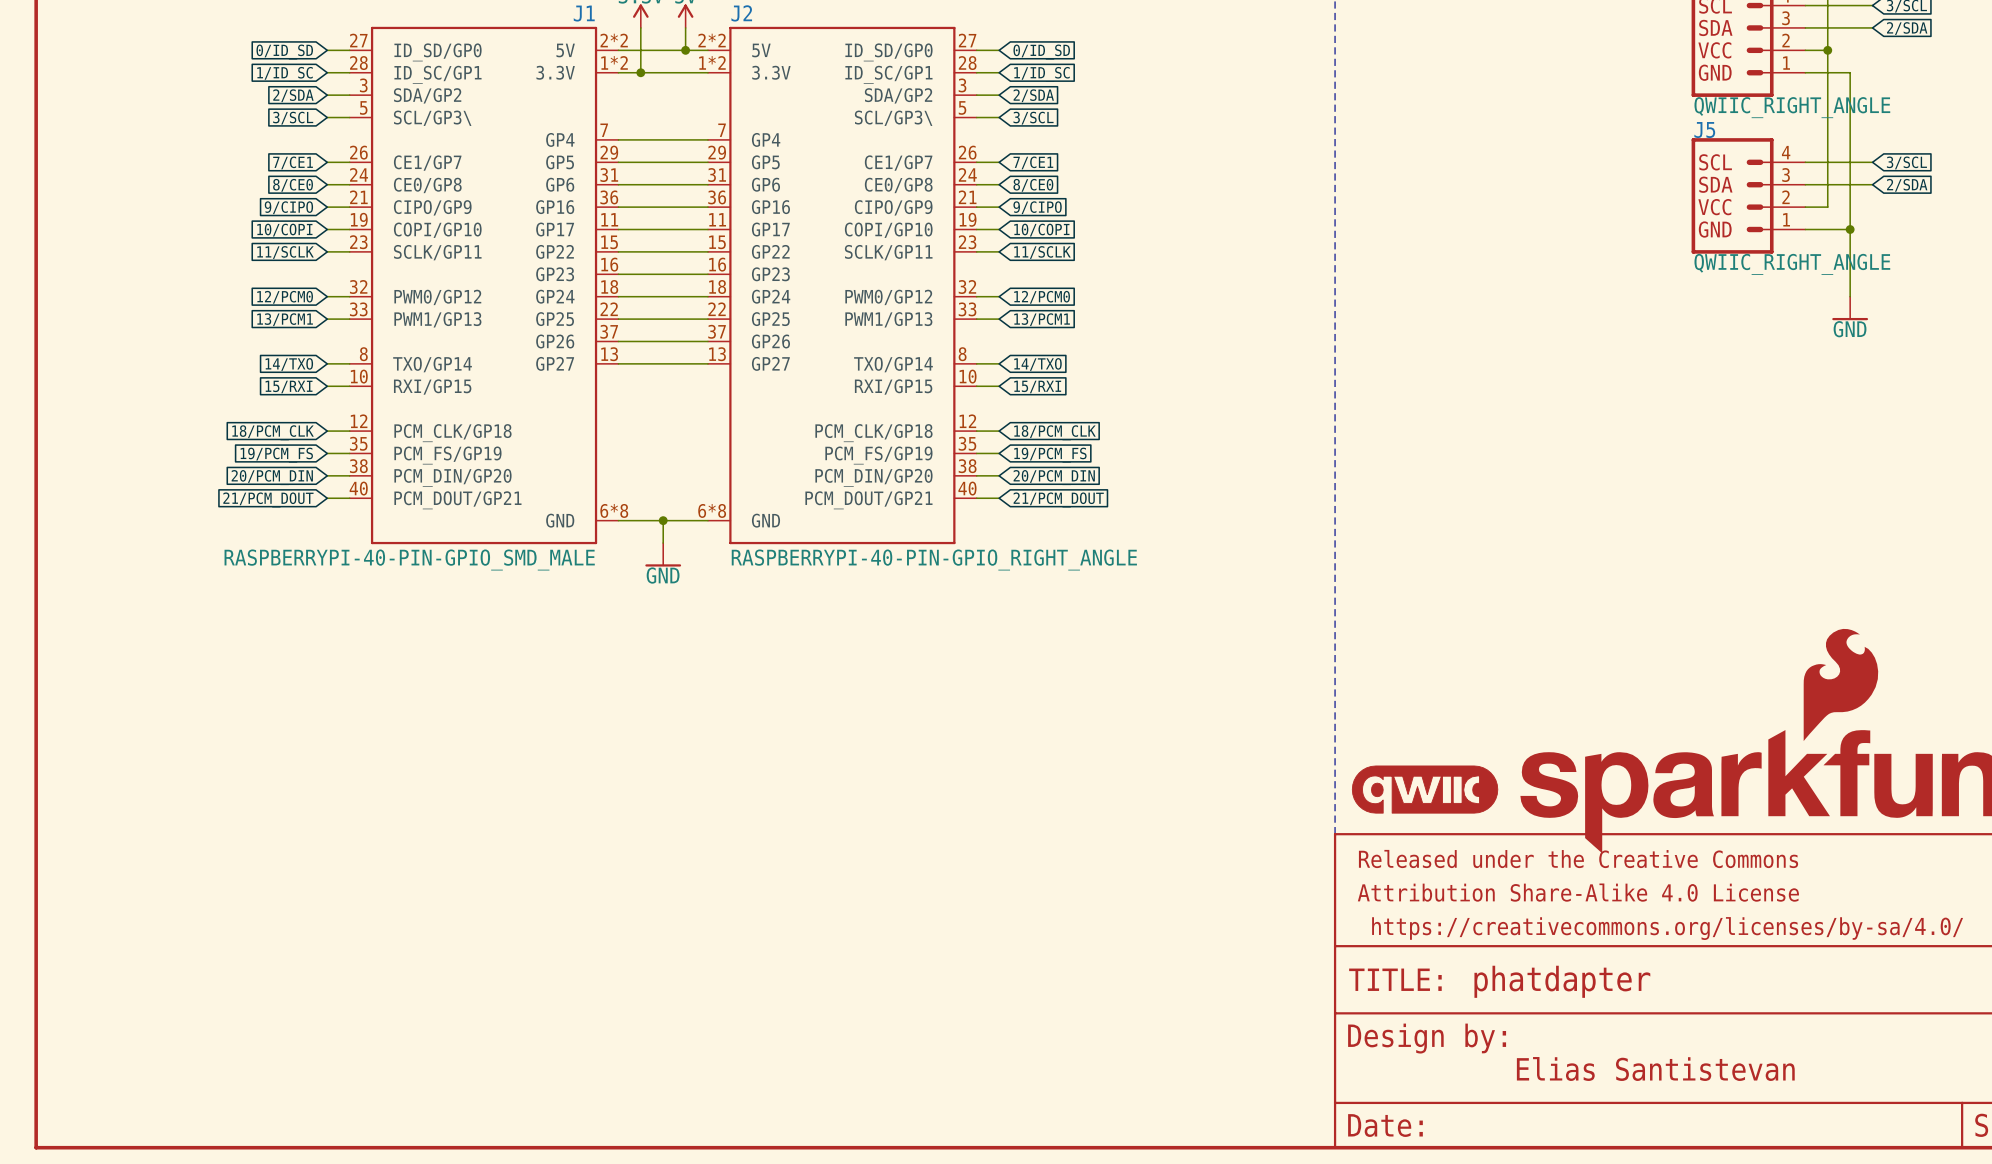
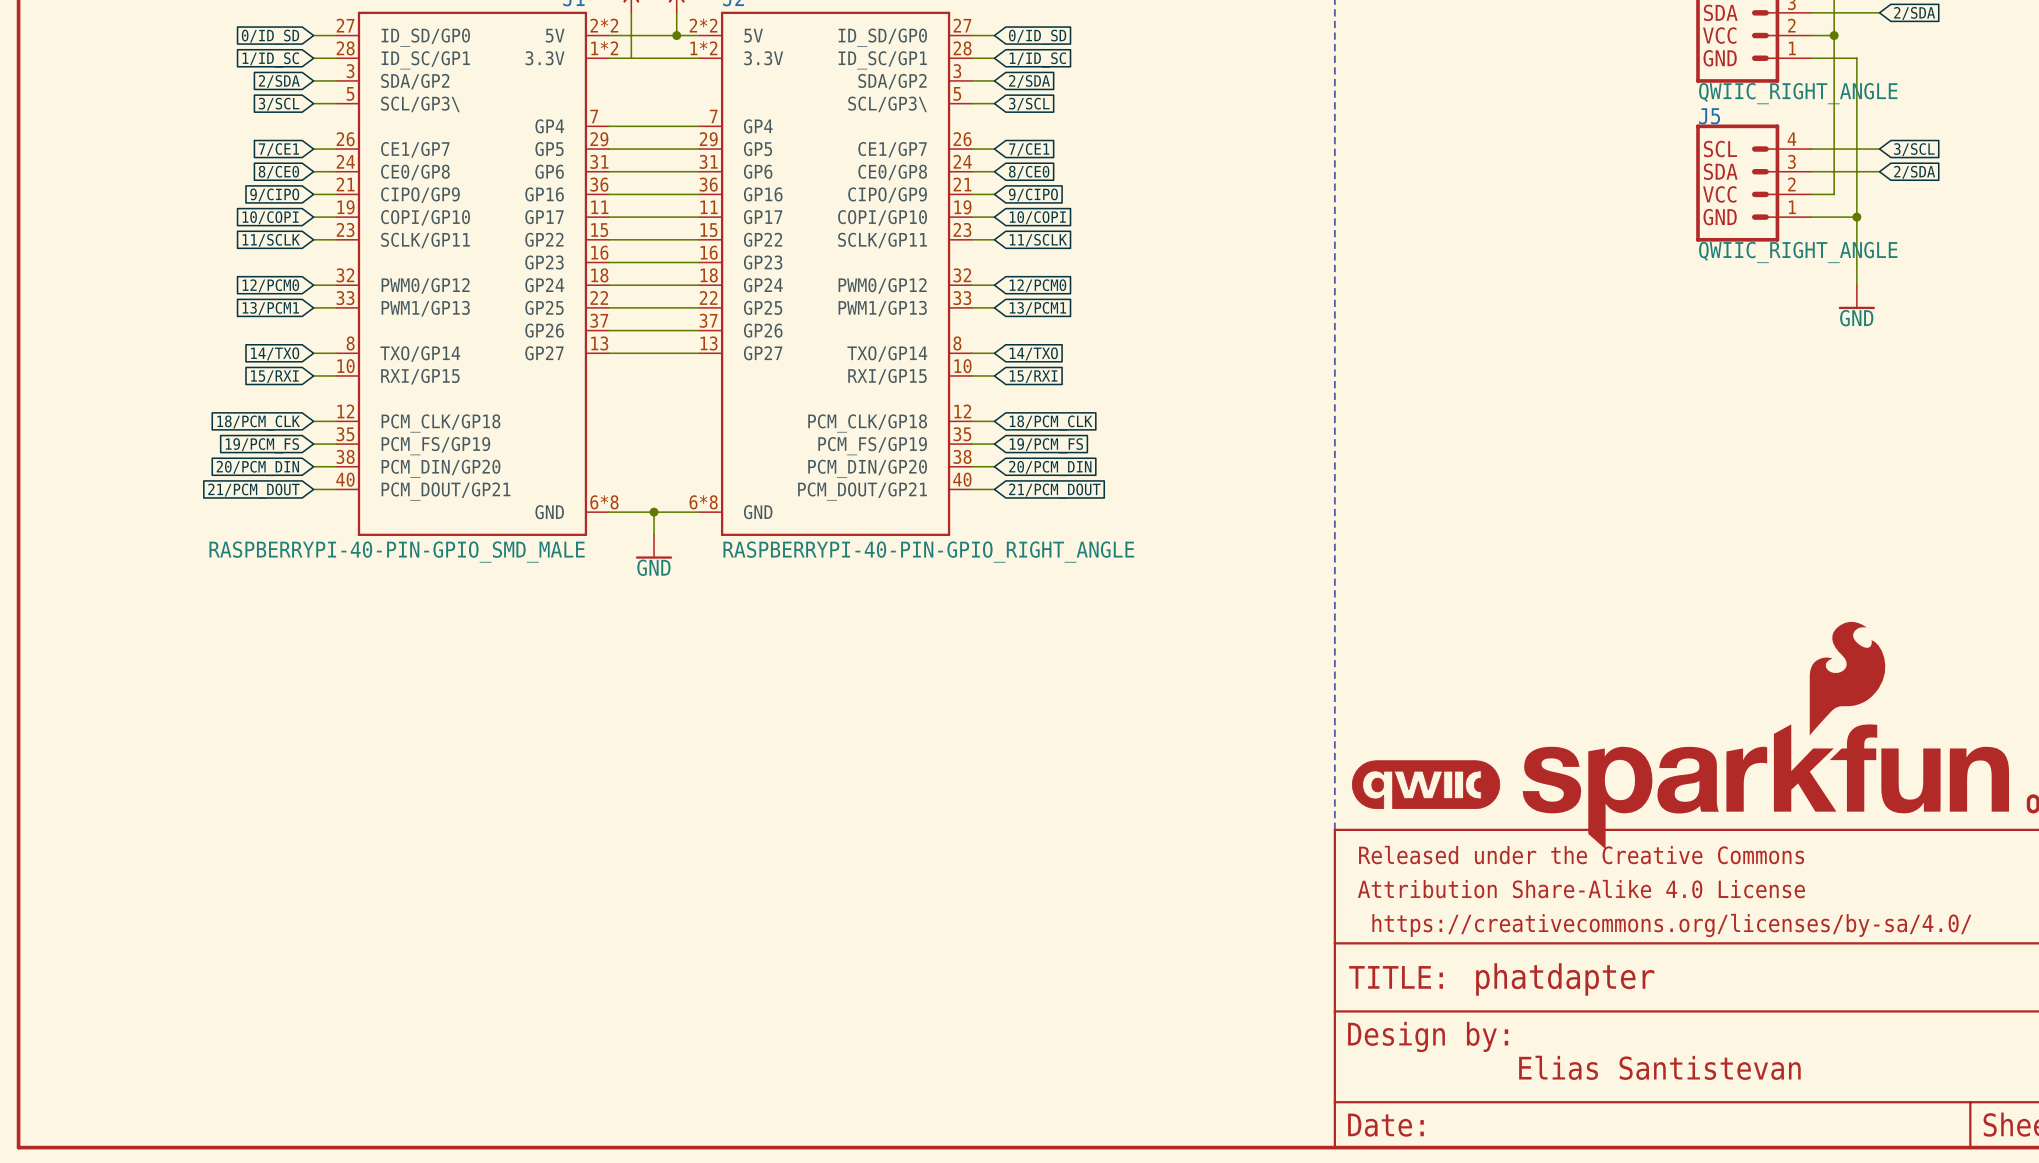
junction: (640, 72) -> none

